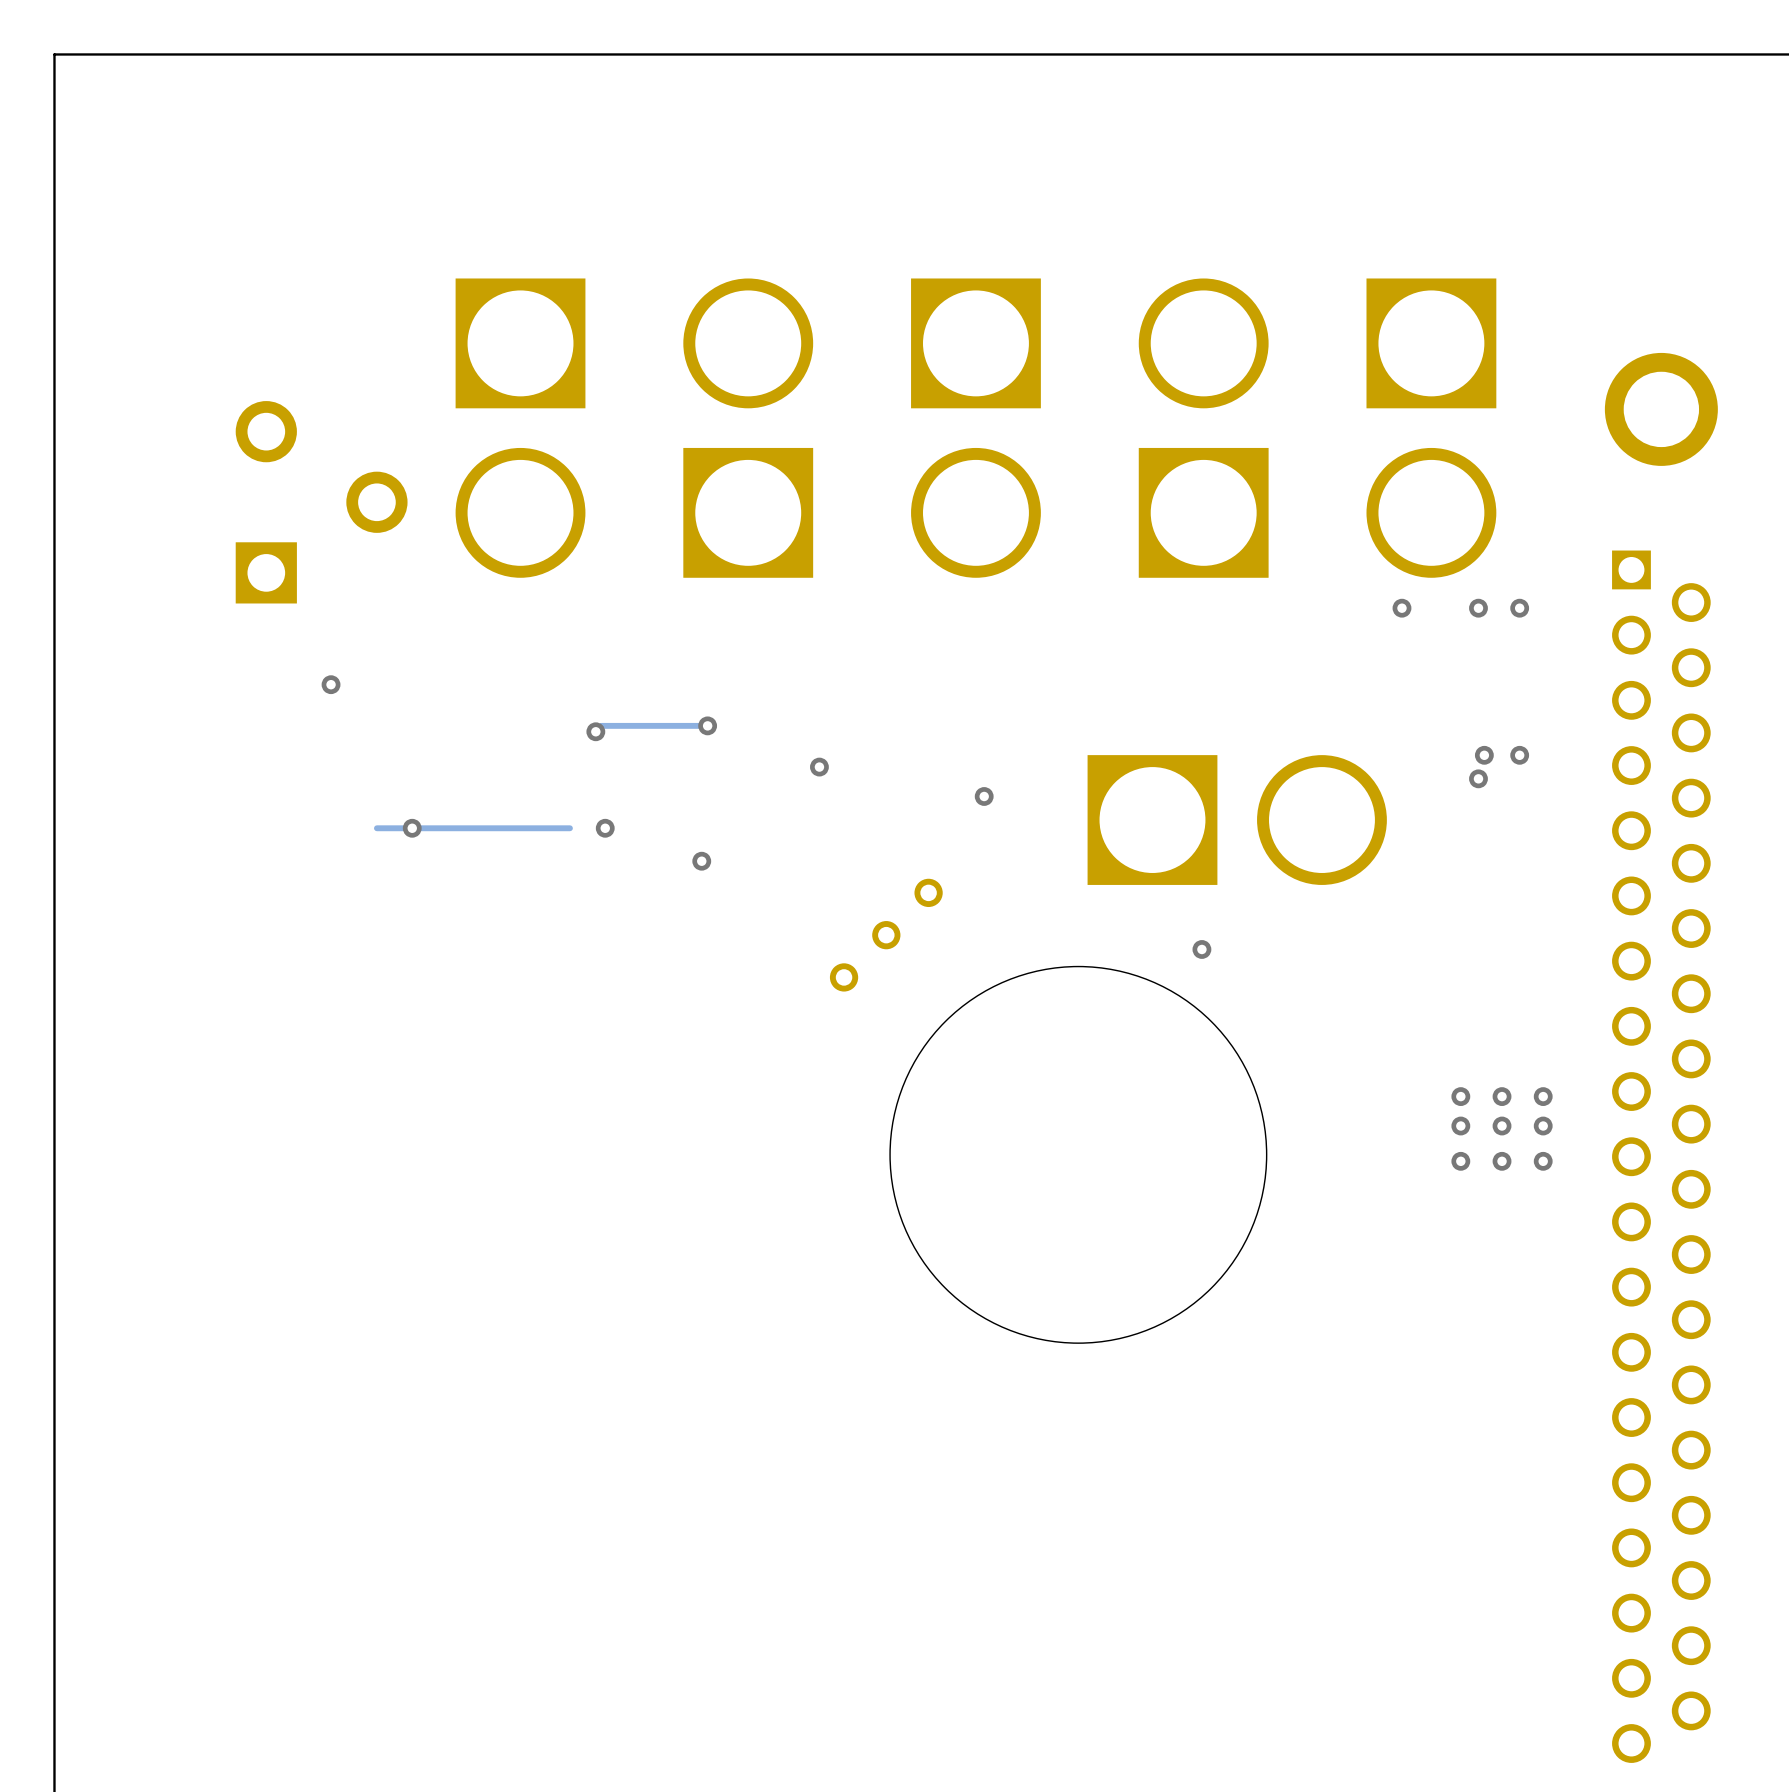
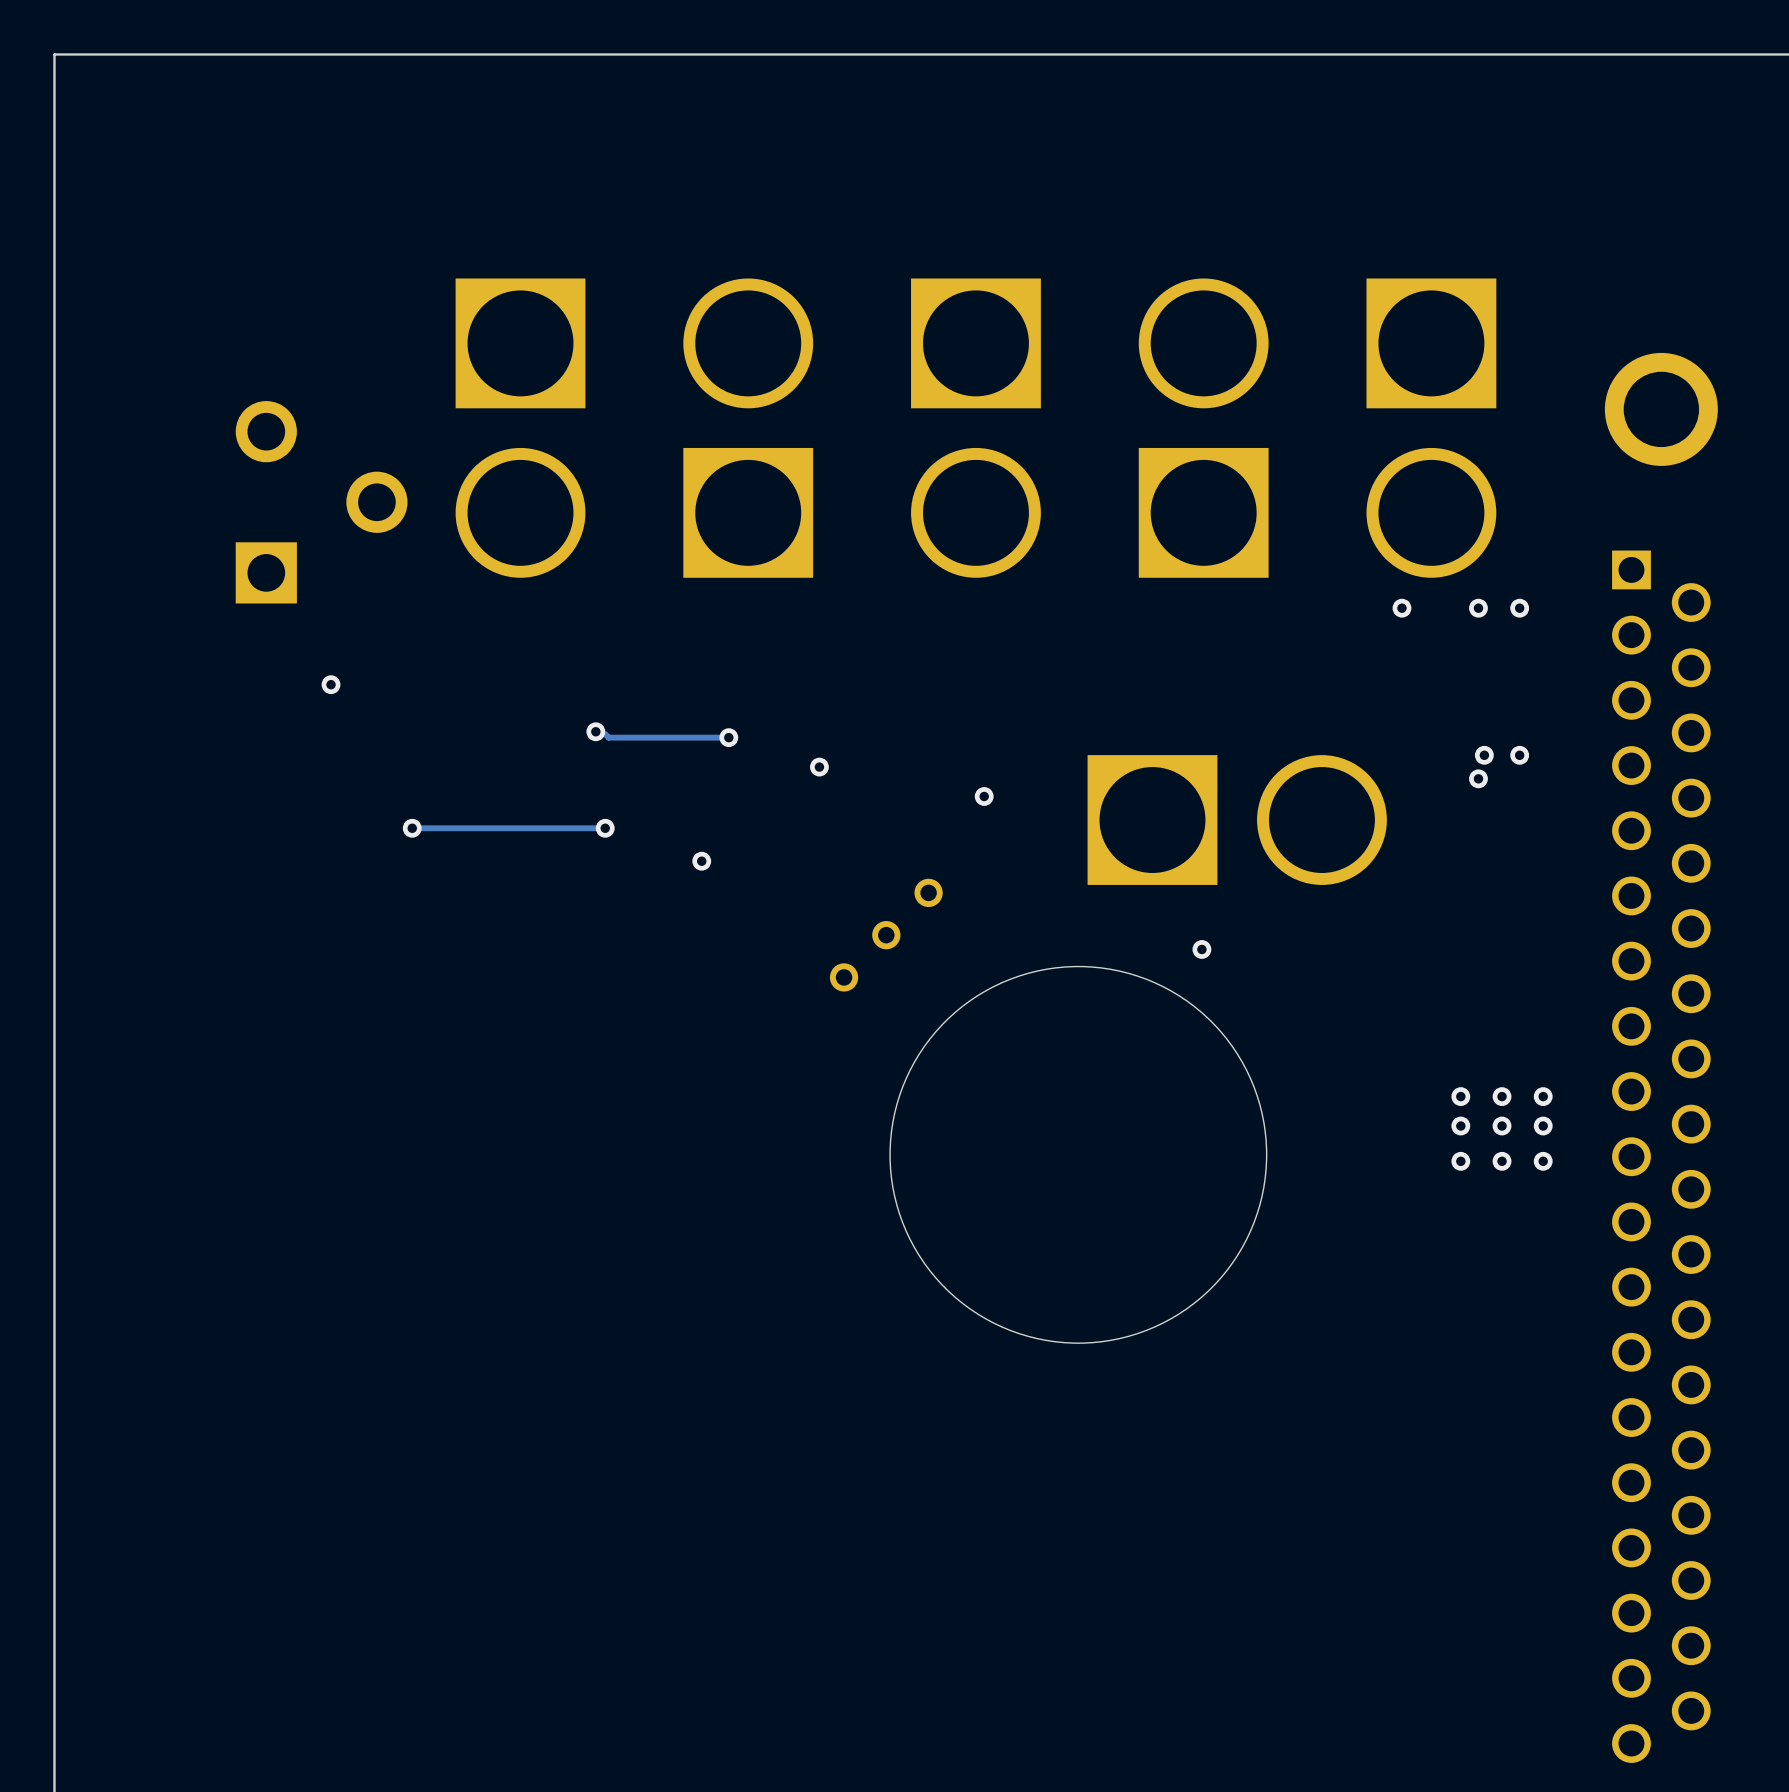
track: (707, 725) (601, 725) (595, 731) -> none
via position: (707, 725) -> (728, 737)
track: none -> (605, 734) (608, 737) (728, 737)
track: (412, 828) (376, 828) -> (605, 828) (569, 828)

